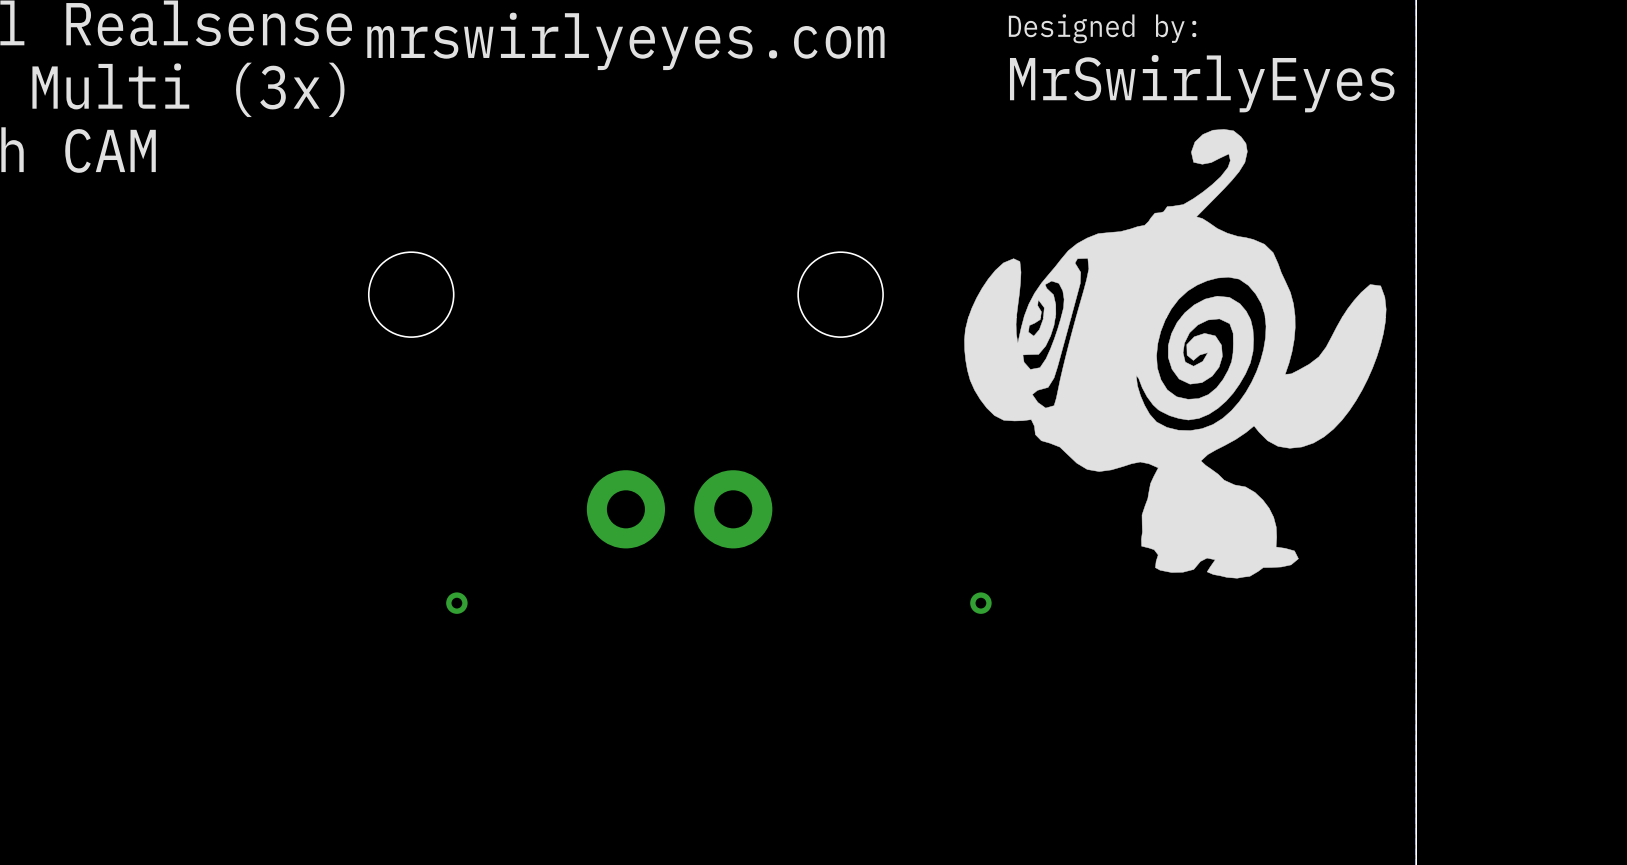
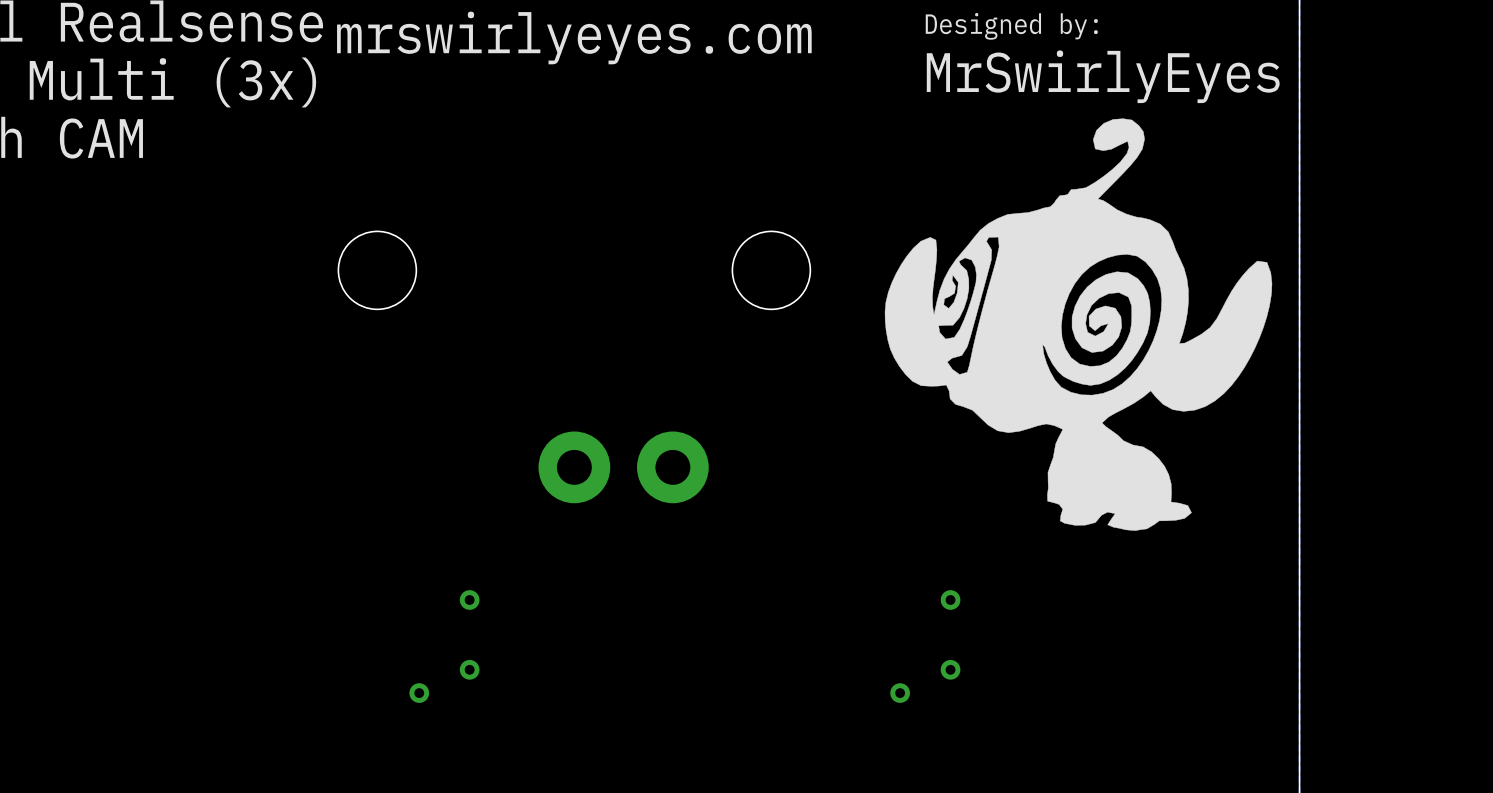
via: (456, 603) -> none
via: (980, 603) -> none
via: none -> (469, 600)
via: none -> (950, 600)
via: none -> (469, 669)
via: none -> (950, 669)
via: none -> (419, 693)
via: none -> (900, 693)

